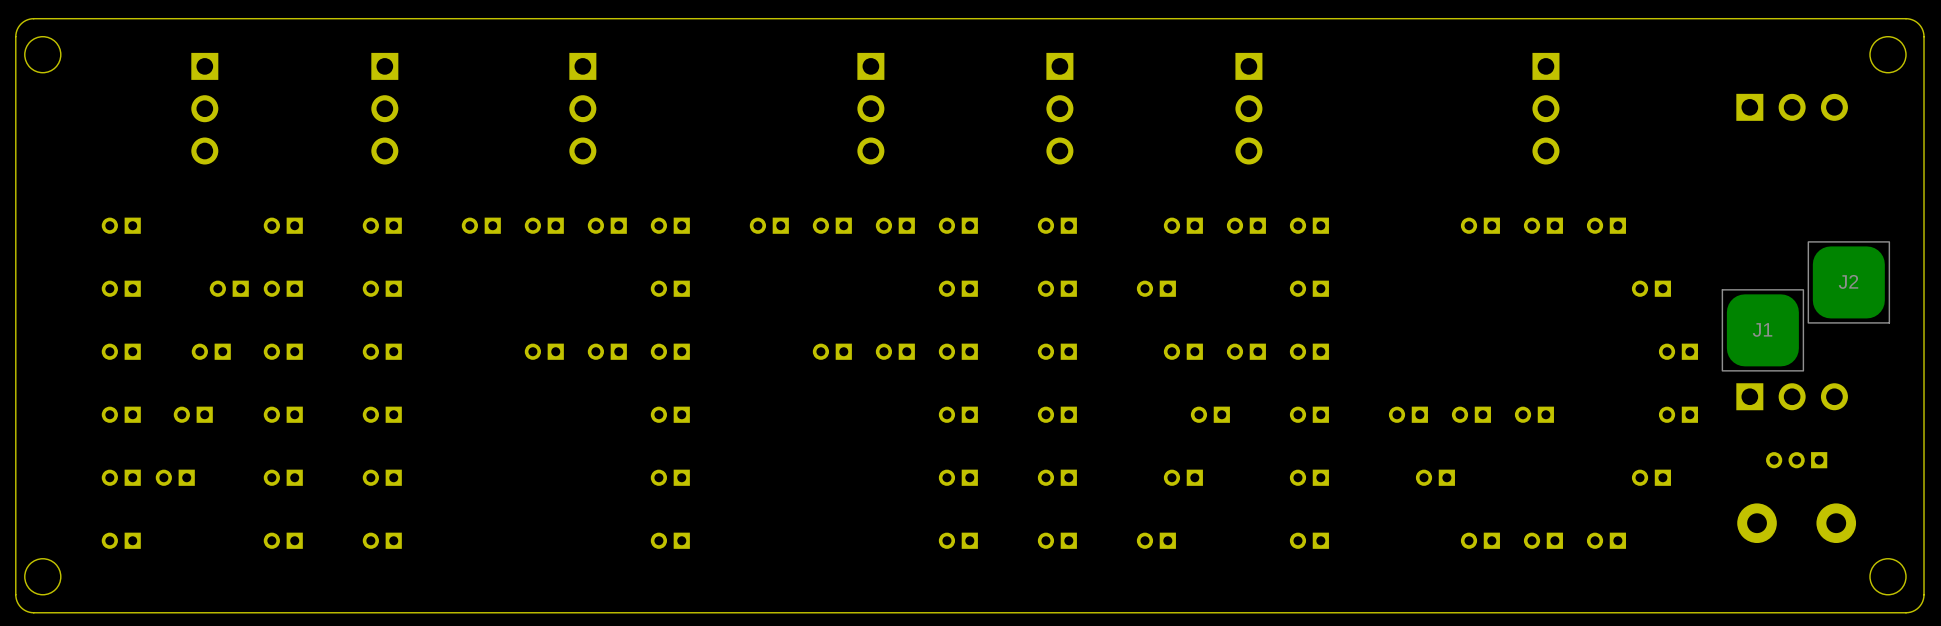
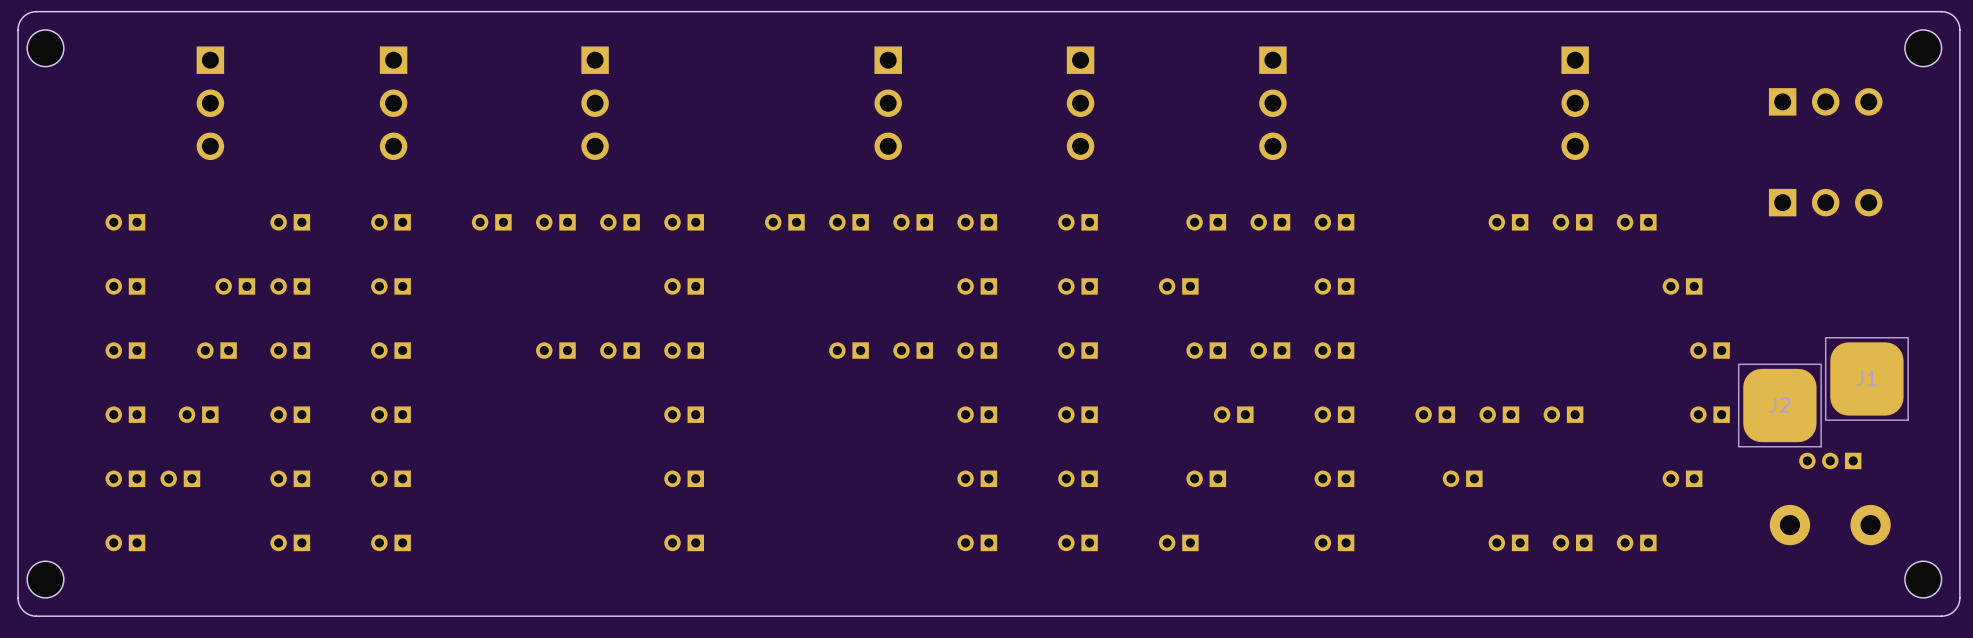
J2 position: (1848, 282) -> (1779, 405)
J1 position: (1762, 330) -> (1866, 378)
part position: (1792, 396) -> (1825, 202)

